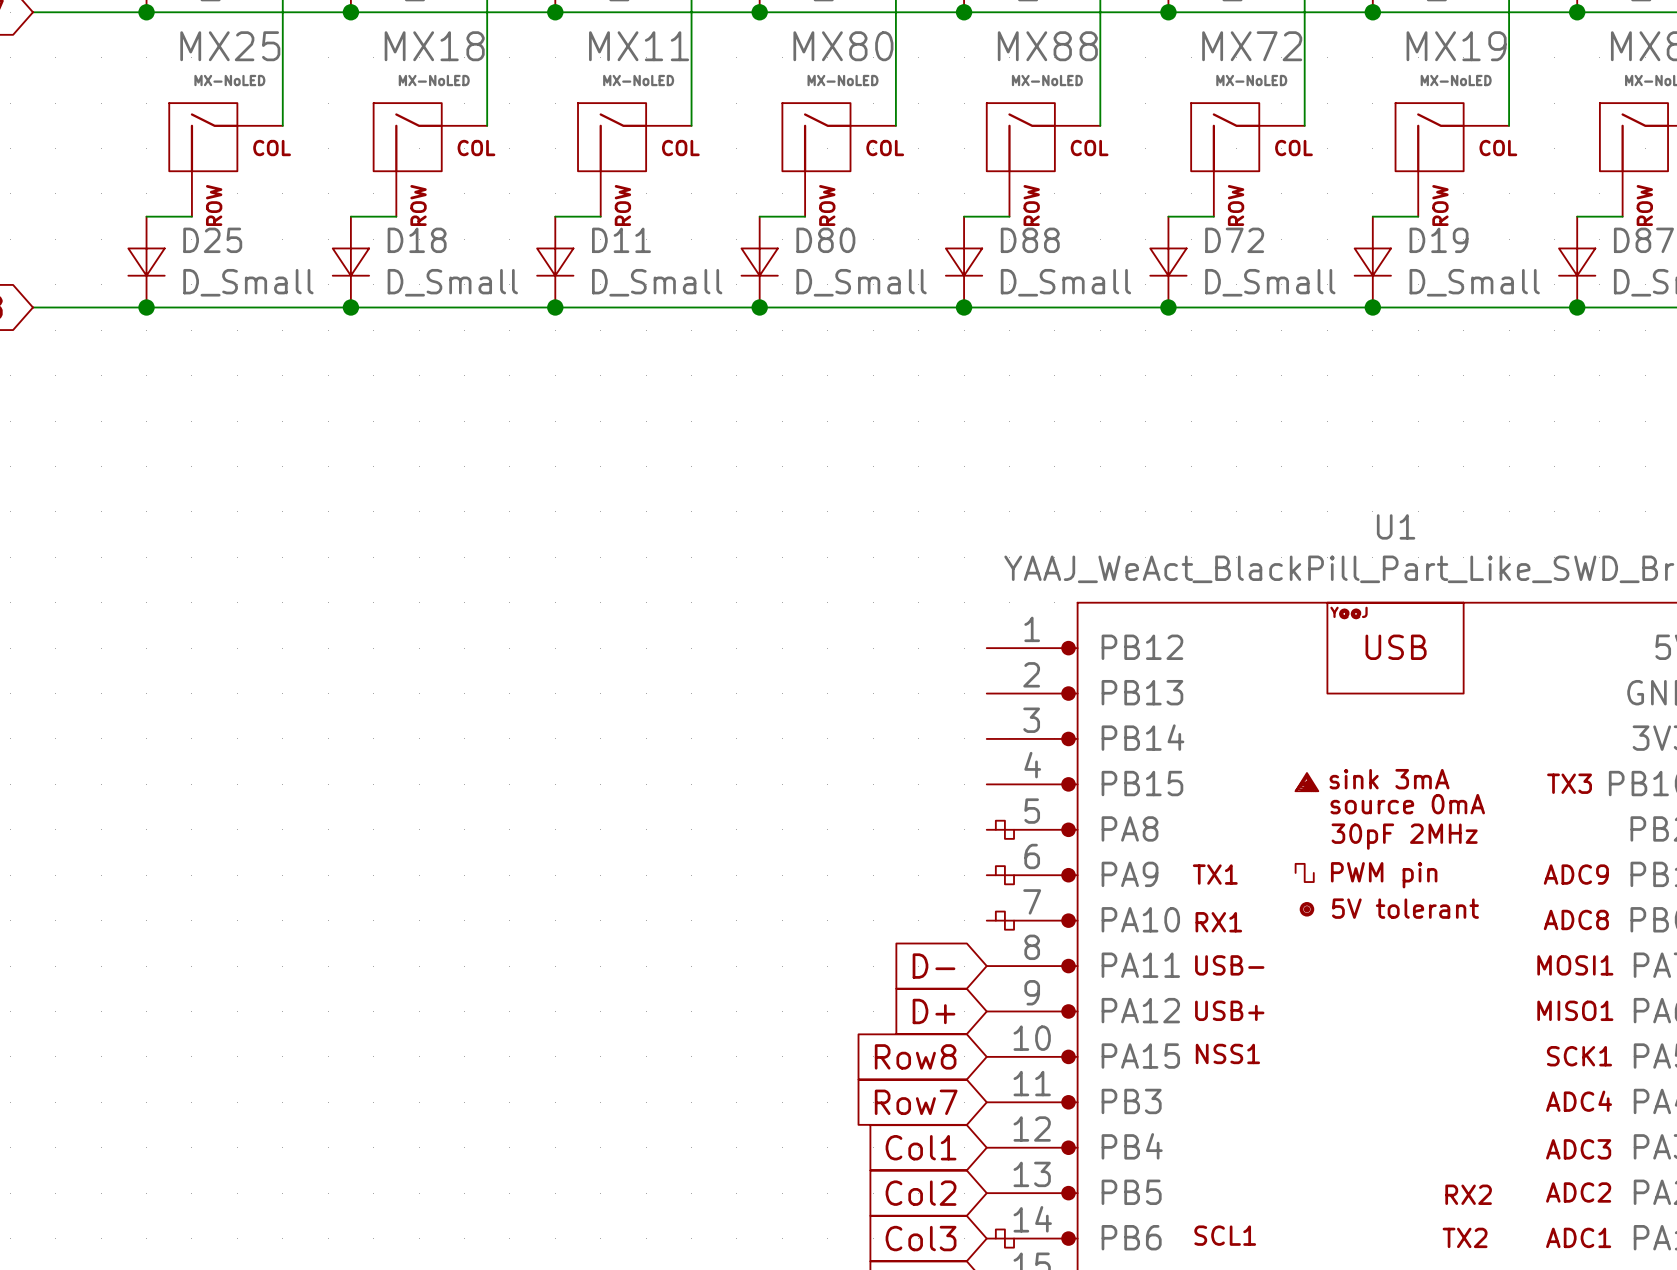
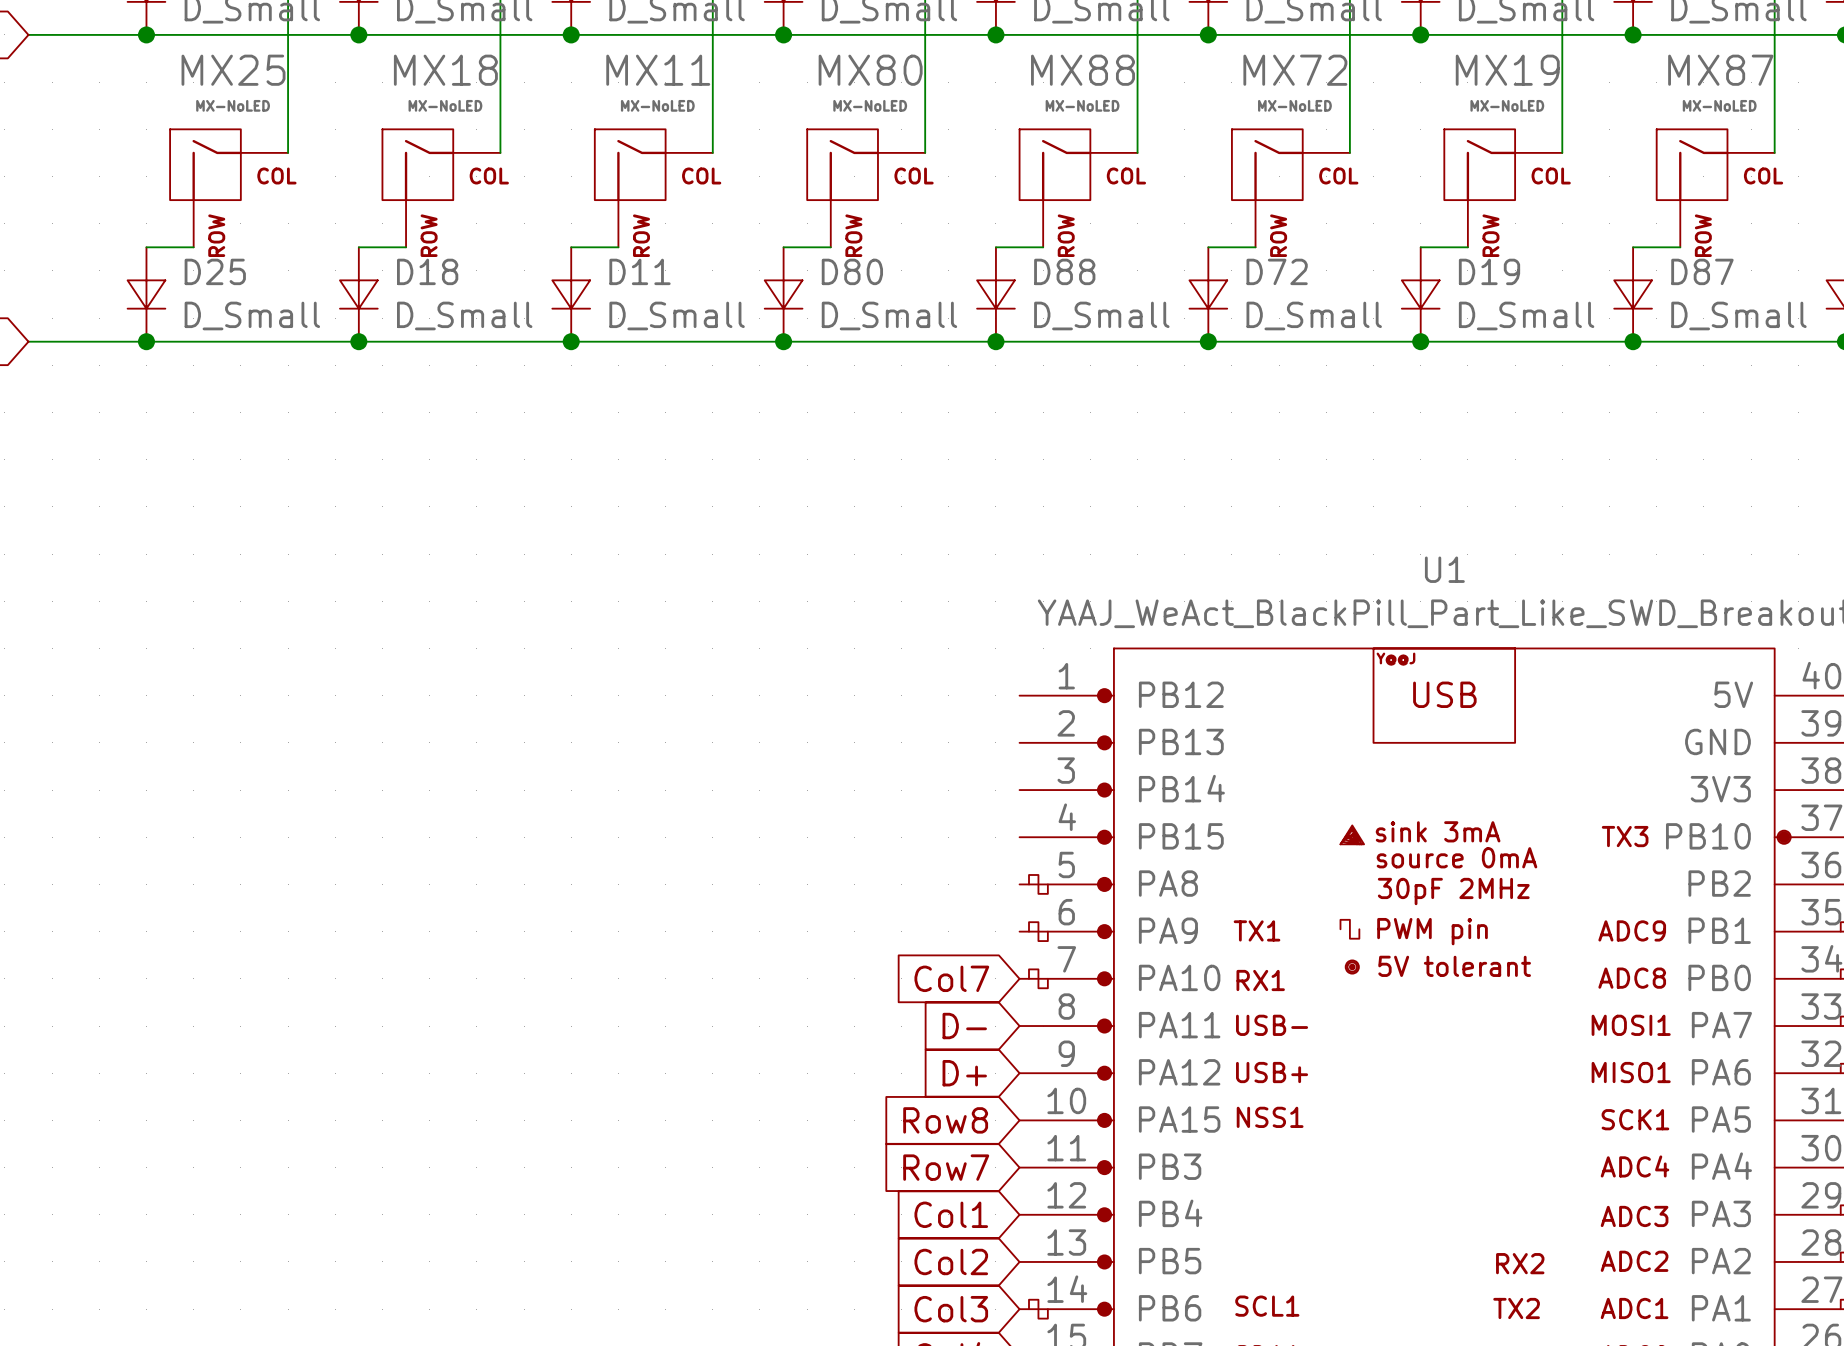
global label: none -> Col7 (951, 978)

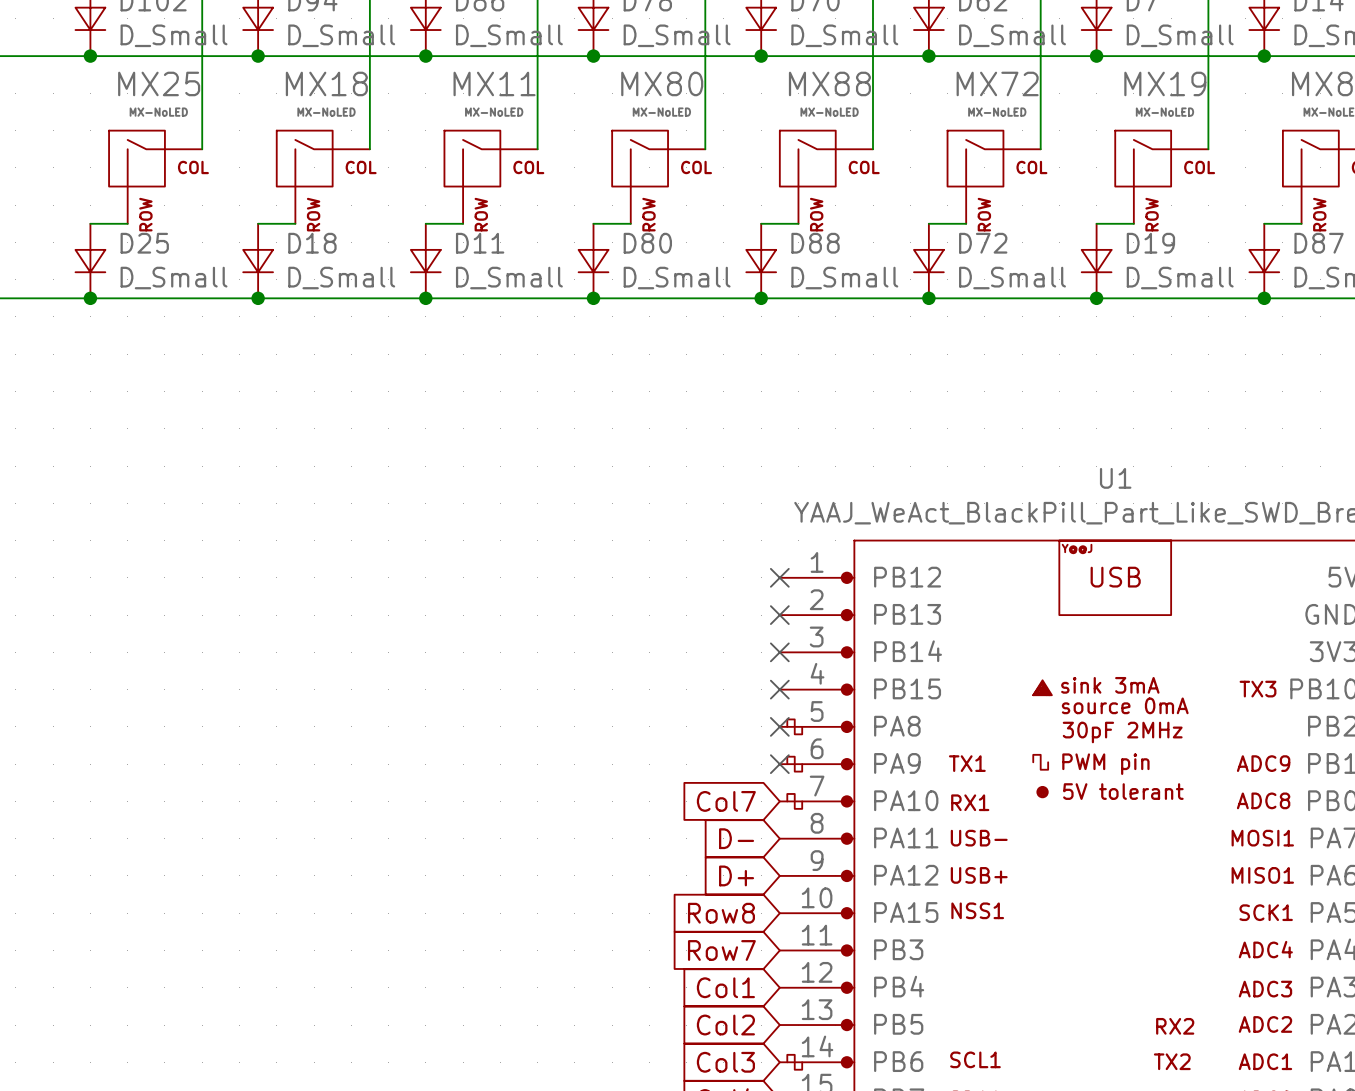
no-connect mark: none -> (779, 577)
no-connect mark: none -> (779, 615)
no-connect mark: none -> (779, 652)
no-connect mark: none -> (779, 689)
no-connect mark: none -> (779, 726)
no-connect mark: none -> (779, 764)

